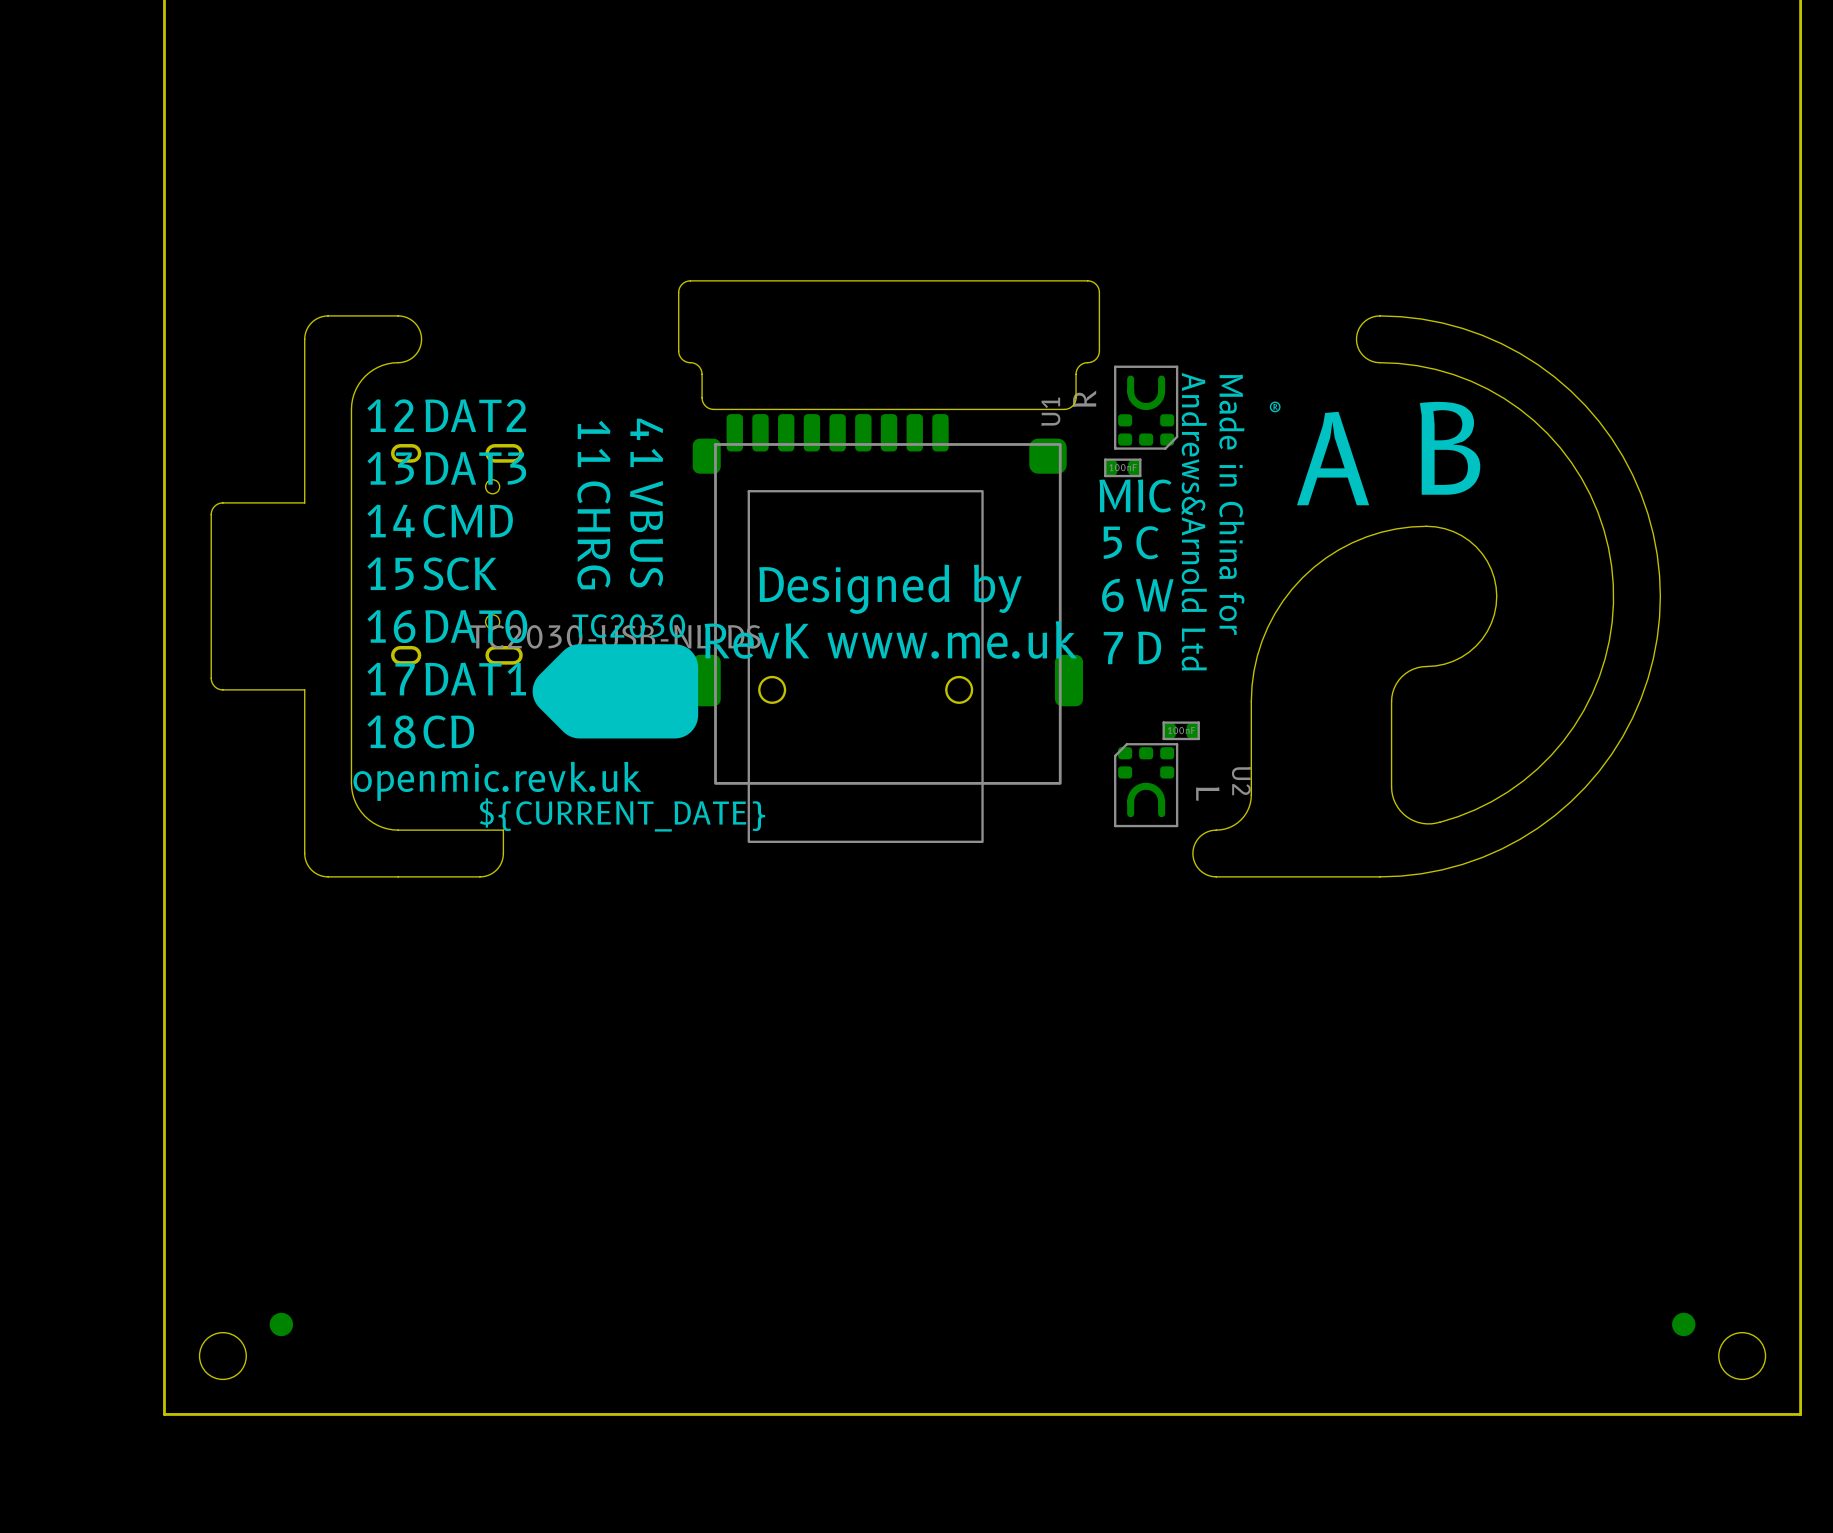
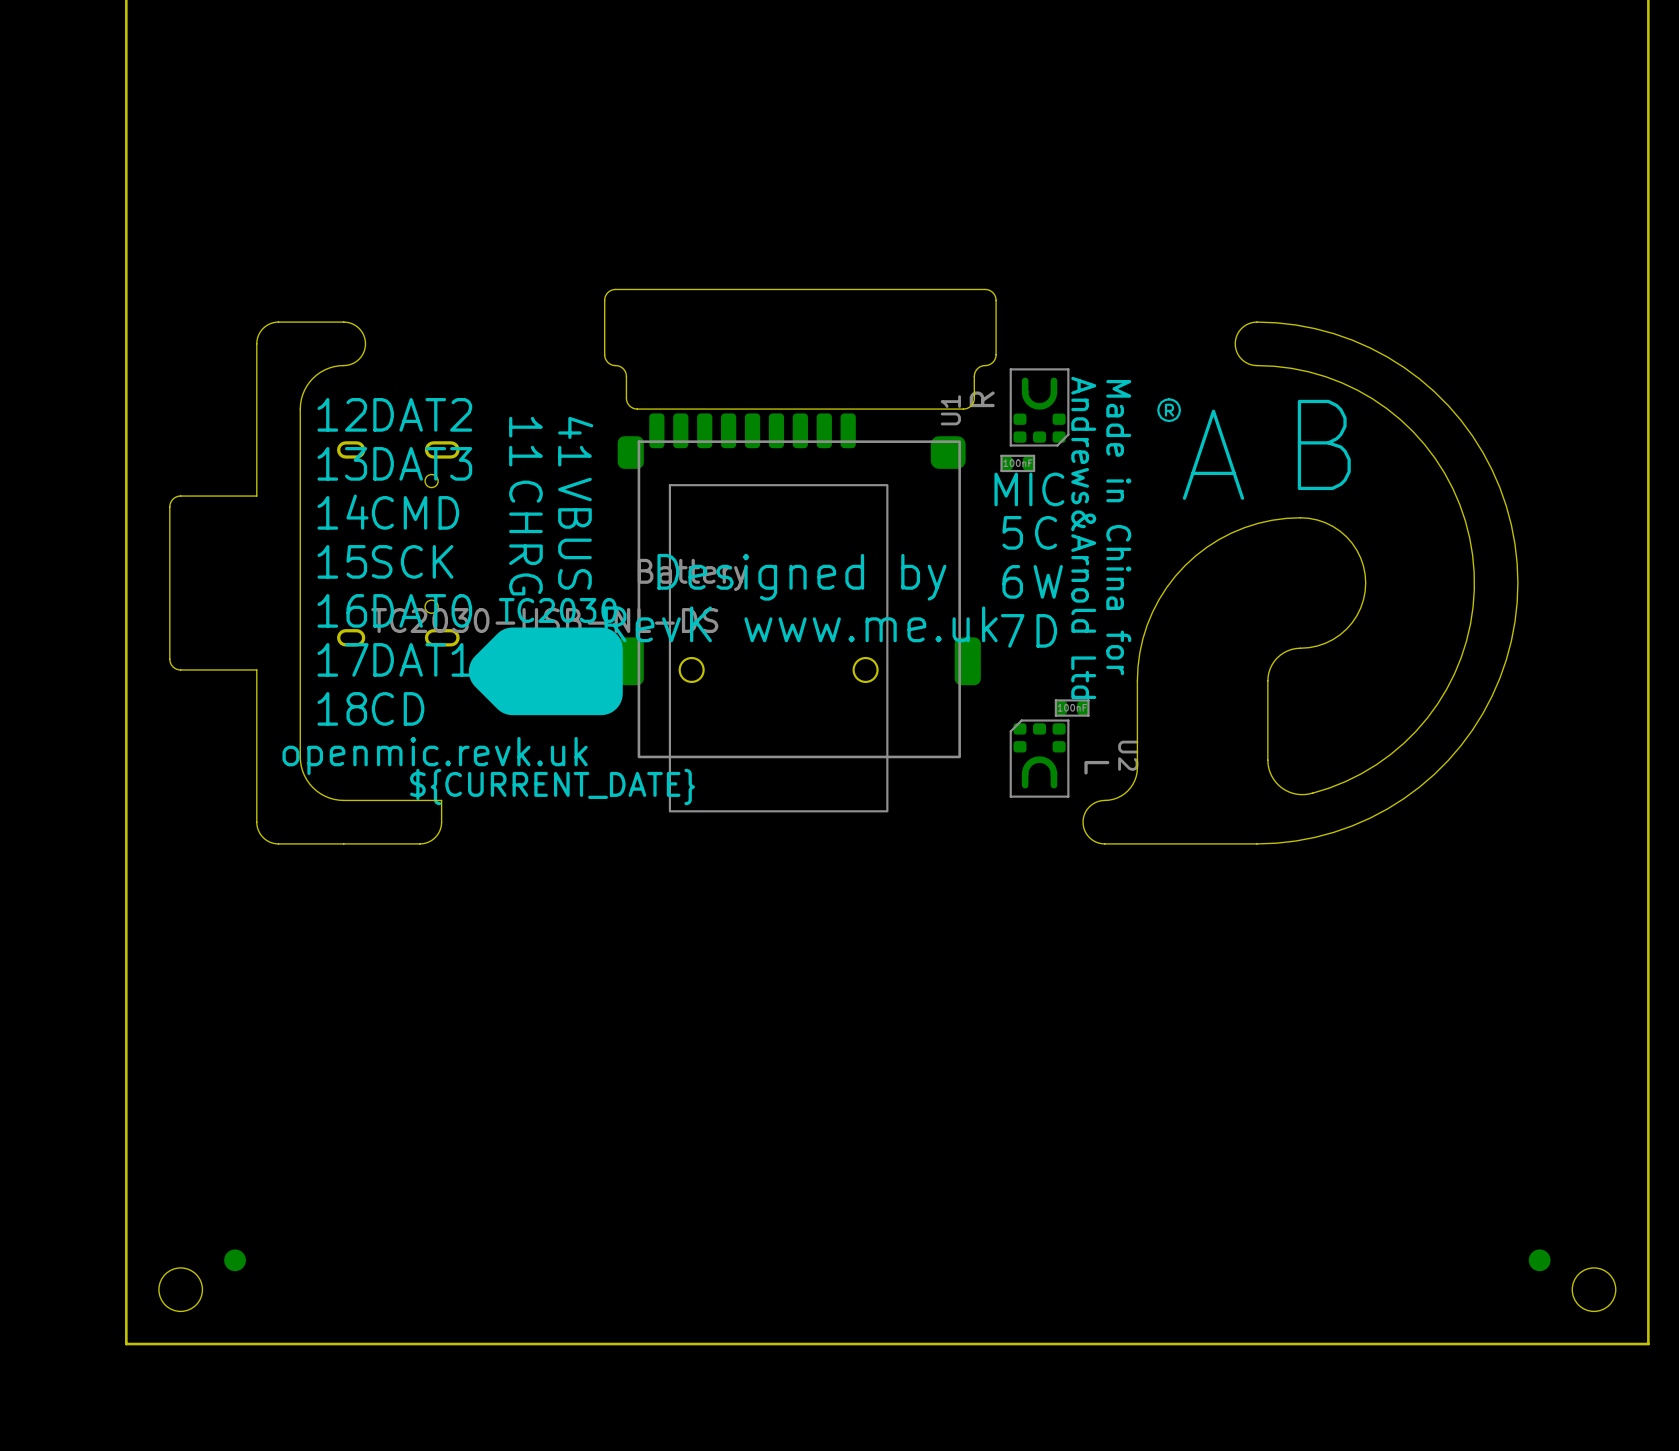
drawing: none -> [637, 558, 748, 592]

